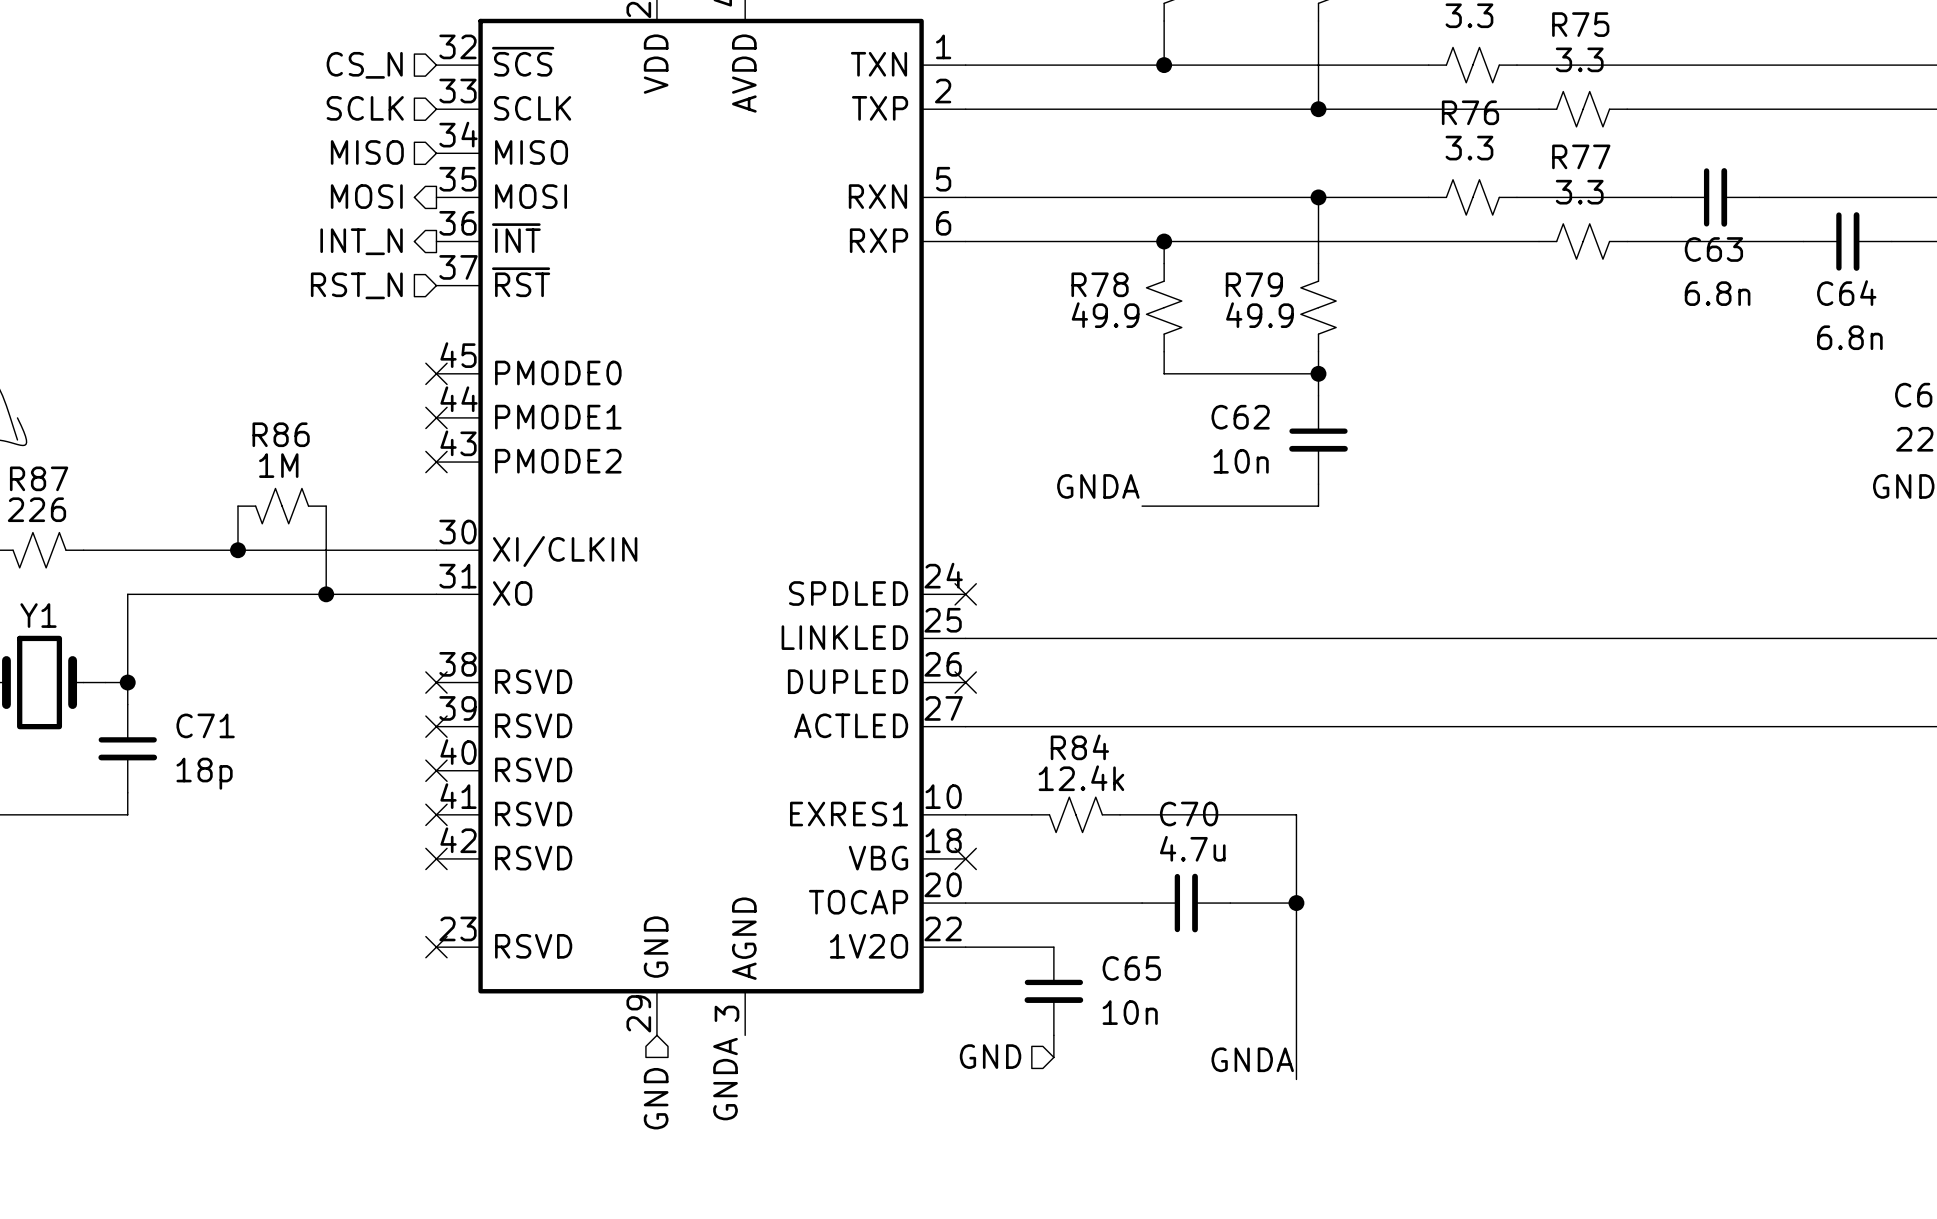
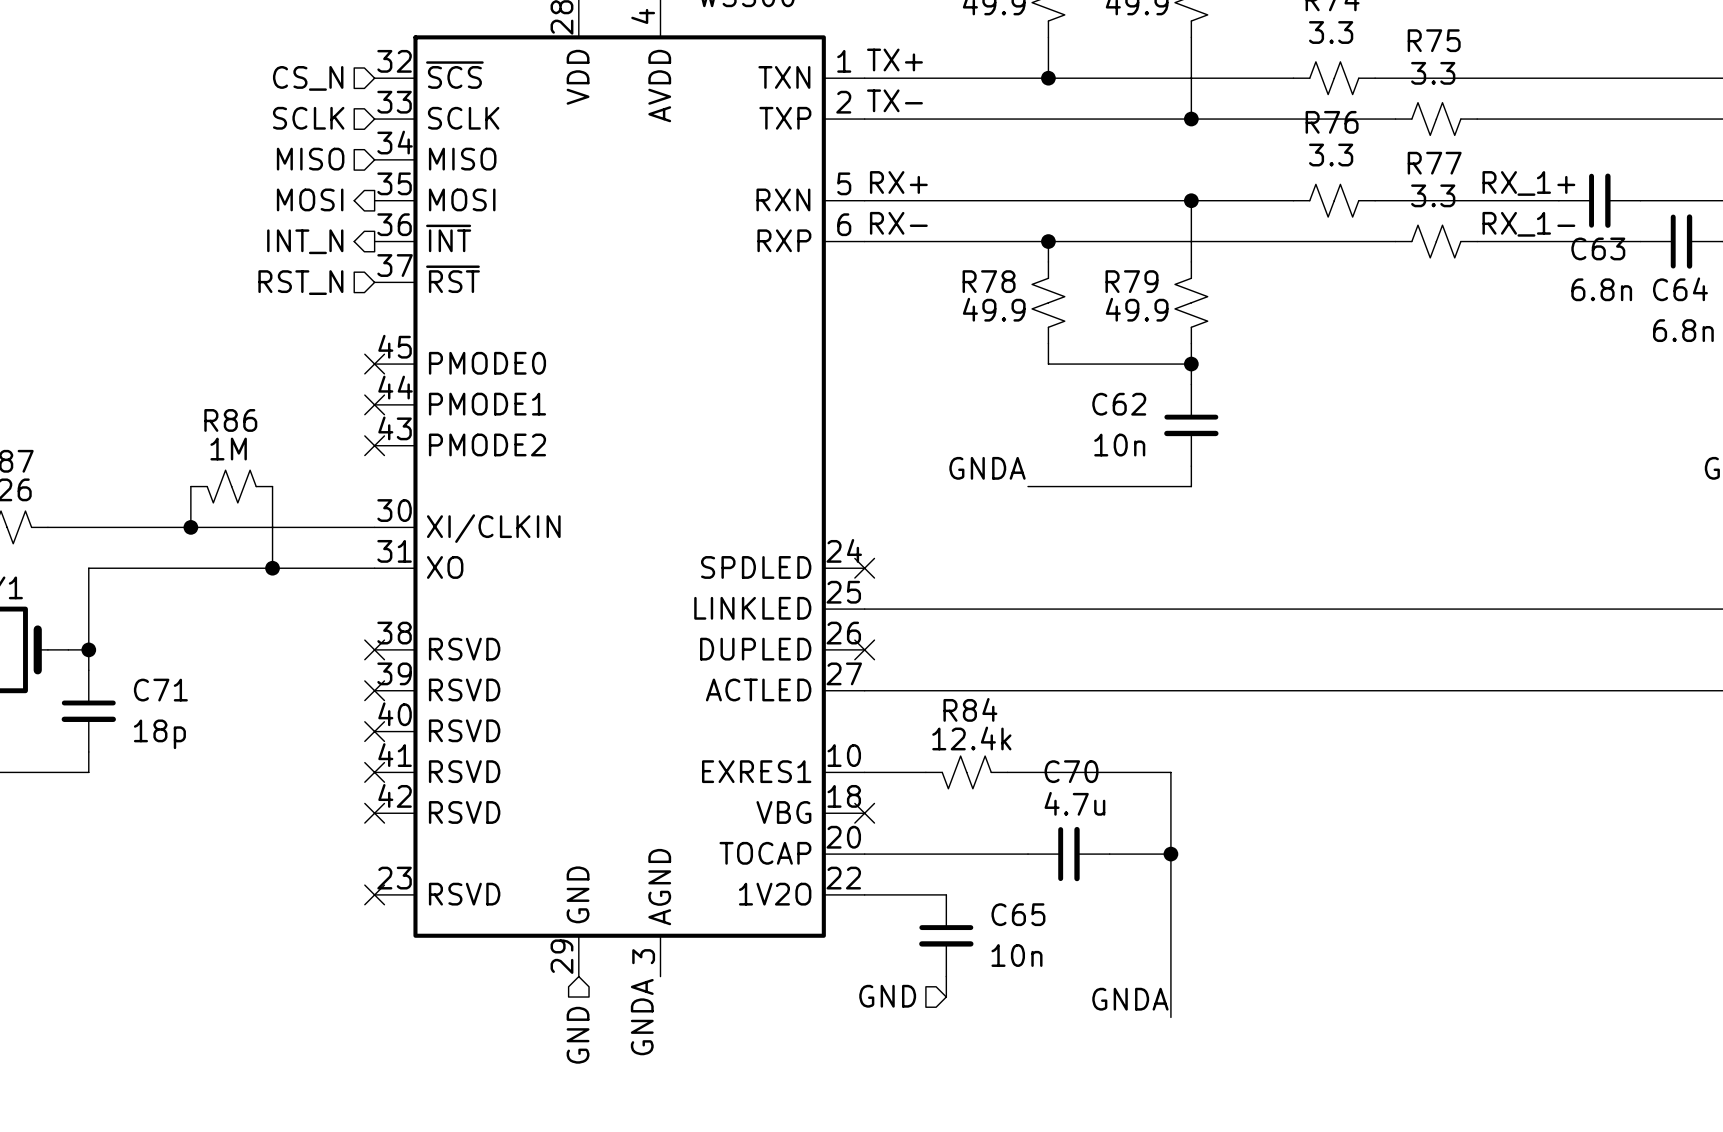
label: none -> TX+ (894, 59)
label: none -> TX- (894, 100)
label: none -> RX+ (898, 182)
label: none -> RX_1+ (1528, 183)
C63 position: (1715, 197) -> (1599, 200)
label: none -> RX- (898, 223)
label: none -> RX_1- (1528, 224)

